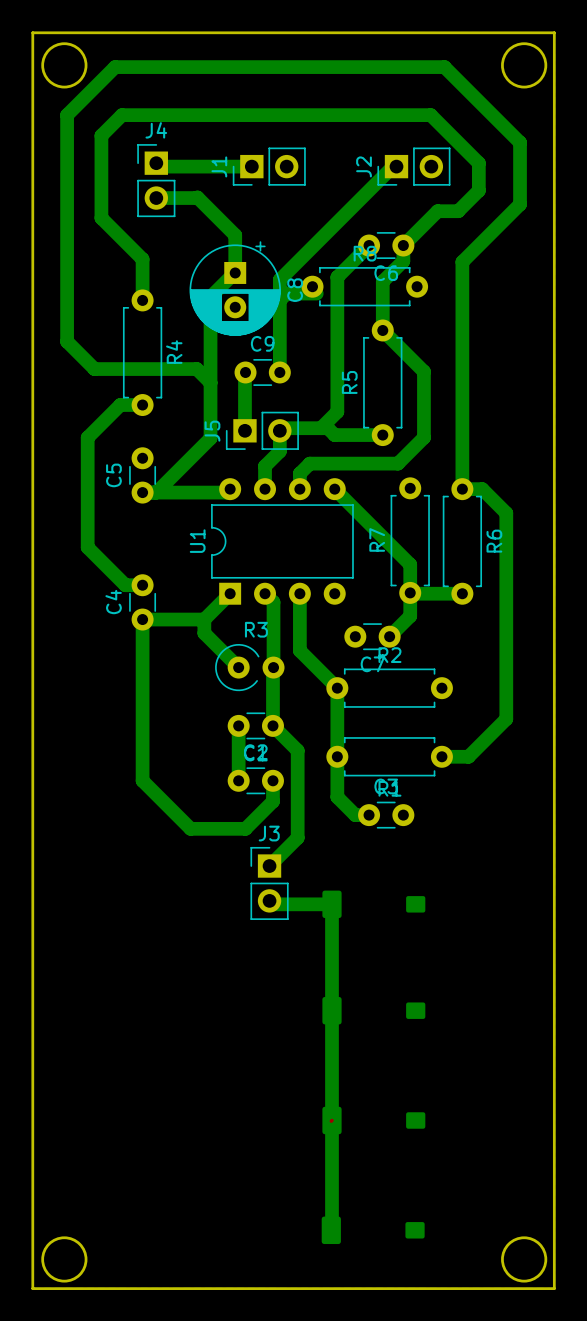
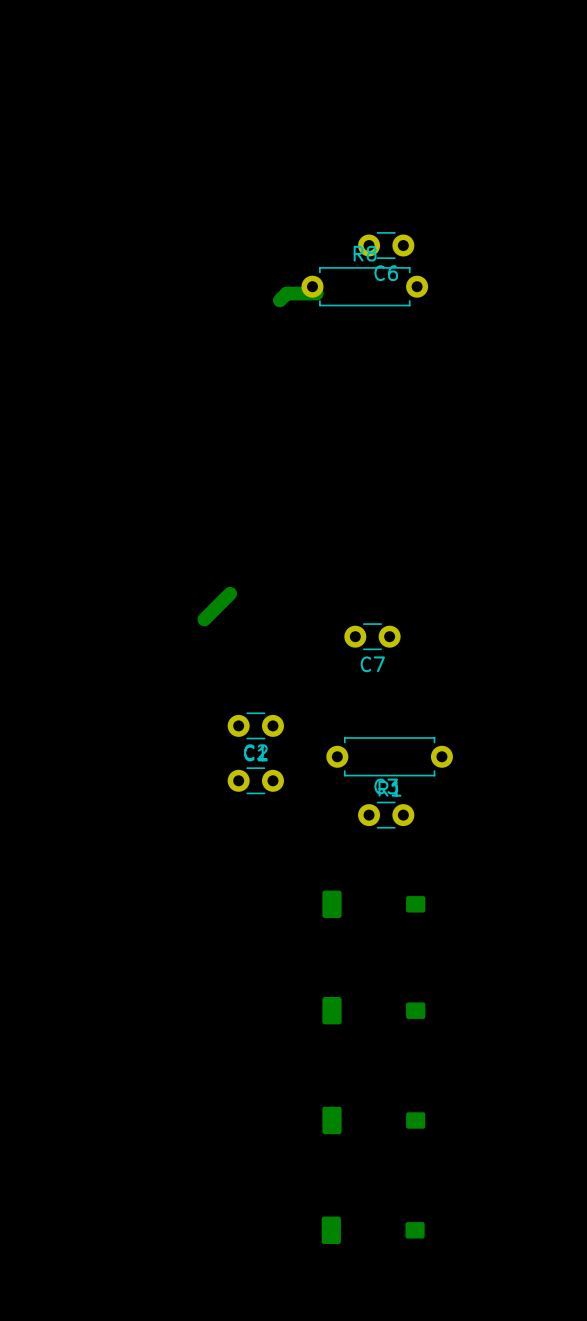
board edge: (32, 32) (554, 32) (554, 1288) (32, 1288) (32, 32) -> none
round board edge: [41, 42, 88, 89] -> none
round board edge: [501, 42, 548, 89] -> none
bottom track: (156, 163) (159, 166) (251, 166) -> none
J1: (269, 166) -> none
bottom track: (396, 166) (393, 166) (279, 279) (279, 372) -> none
J2: (413, 166) -> none
J4: (156, 180) -> none
bottom track: (156, 198) (197, 197) (235, 235) (235, 272) (210, 297) (210, 438) (156, 492) -> none
bottom track: (369, 245) (337, 277) (337, 411) (321, 428) -> none
C8: (235, 288) -> none
bottom track: (142, 300) (142, 259) (101, 218) (101, 135) (122, 115) (430, 115) (478, 163) (478, 190) (458, 211) (437, 211) (403, 245) (403, 261) (382, 281) (382, 330) (423, 371) (423, 437) (398, 463) (309, 463) (299, 473) (299, 489) -> none
R4: (142, 352) -> none
bottom track: (245, 372) (244, 430) -> none
C9: (262, 372) -> none
bottom track: (210, 382) (196, 369) (94, 369) (67, 341) (67, 115) (115, 67) (444, 67) (520, 142) (520, 204) (462, 262) (462, 489) (482, 489) (506, 513) (506, 719) (468, 756) (441, 756) -> none
R5: (382, 382) -> none
bottom track: (142, 405) (120, 405) (87, 437) (87, 547) (125, 585) (142, 585) -> none
J5: (262, 430) -> none
bottom track: (382, 435) (334, 435) (327, 428) (282, 428) (279, 430) (279, 451) (265, 466) (265, 489) -> none
C5: (142, 475) -> none
bottom track: (230, 489) (226, 492) (142, 492) -> none
bottom track: (334, 489) (410, 564) (410, 616) (389, 636) -> none
R7: (410, 540) -> none
U1: (282, 541) -> none
R6: (462, 541) -> none
bottom track: (410, 592) (462, 593) -> none
bottom track: (265, 593) (273, 602) (272, 725) (297, 750) (297, 837) (269, 866) -> none
bottom track: (299, 593) (299, 650) (337, 688) (337, 797) (355, 815) (369, 815) -> none
C4: (142, 602) -> none
bottom track: (238, 667) (204, 633) (204, 619) (142, 619) (142, 780) (190, 828) (245, 828) (272, 801) (272, 780) -> none
R3: (249, 667) -> none
R2: (389, 688) -> none
bottom track: (238, 725) (238, 780) -> none
J3: (269, 883) -> none
bottom track: (269, 900) (272, 904) (331, 904) (331, 1230) -> none
top track: (331, 1120) (331, 1121) -> none
round board edge: [41, 1236, 88, 1283] -> none
round board edge: [501, 1236, 548, 1283] -> none

